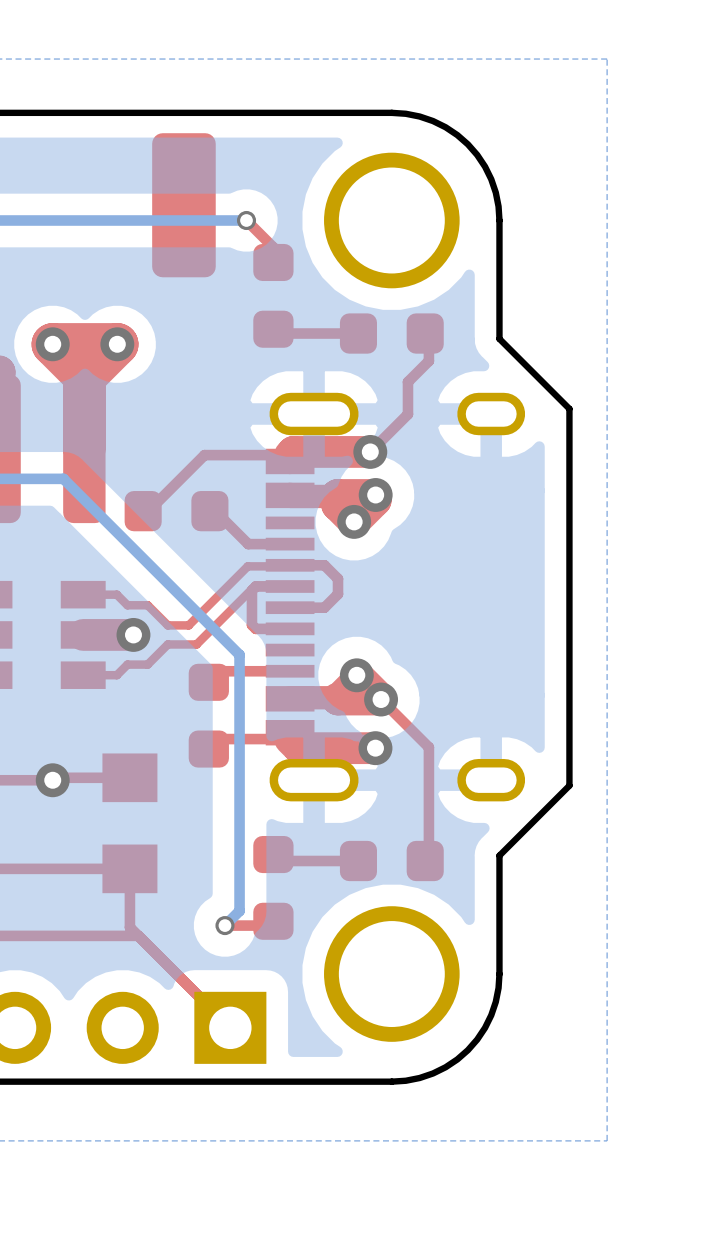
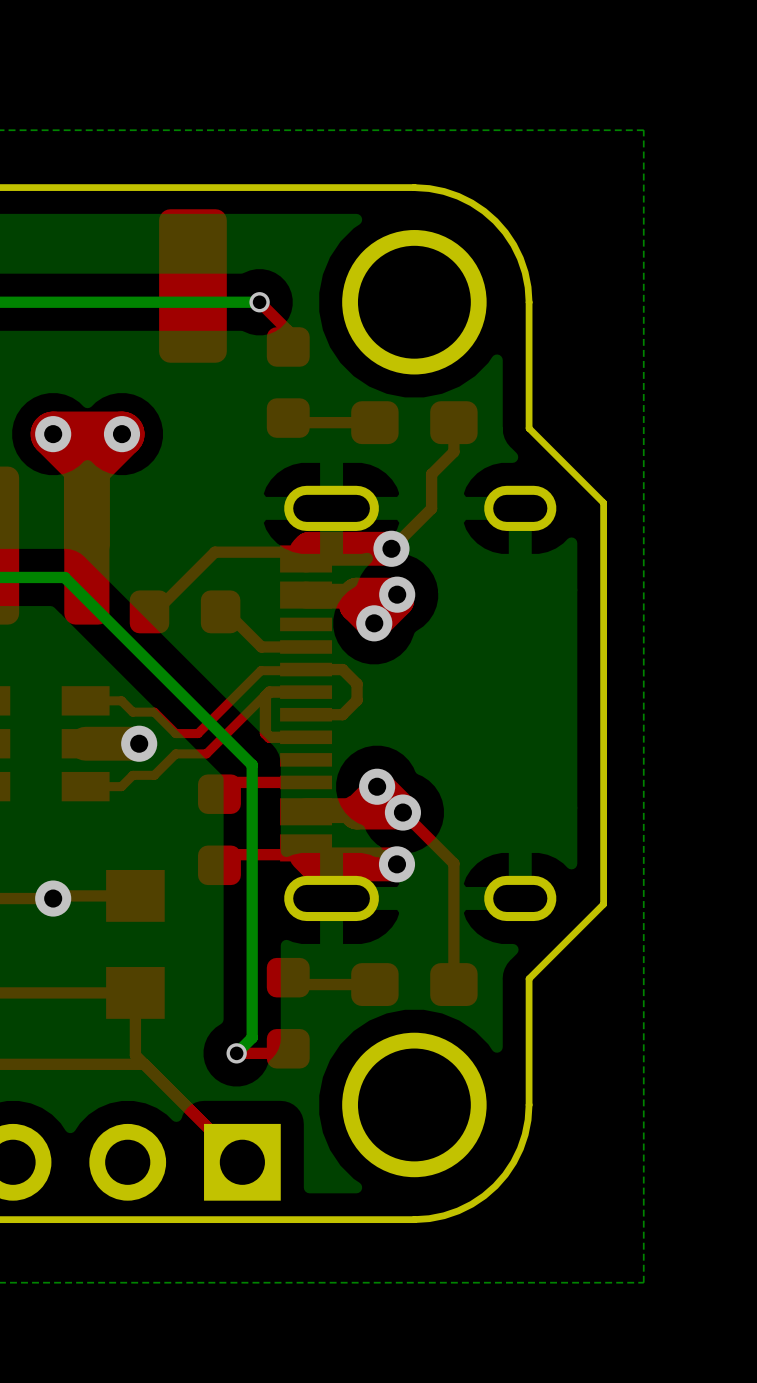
part footprint: [339, 313, 444, 354] -> [351, 401, 478, 445]
part footprint: [339, 840, 444, 882] -> [351, 963, 478, 1007]

